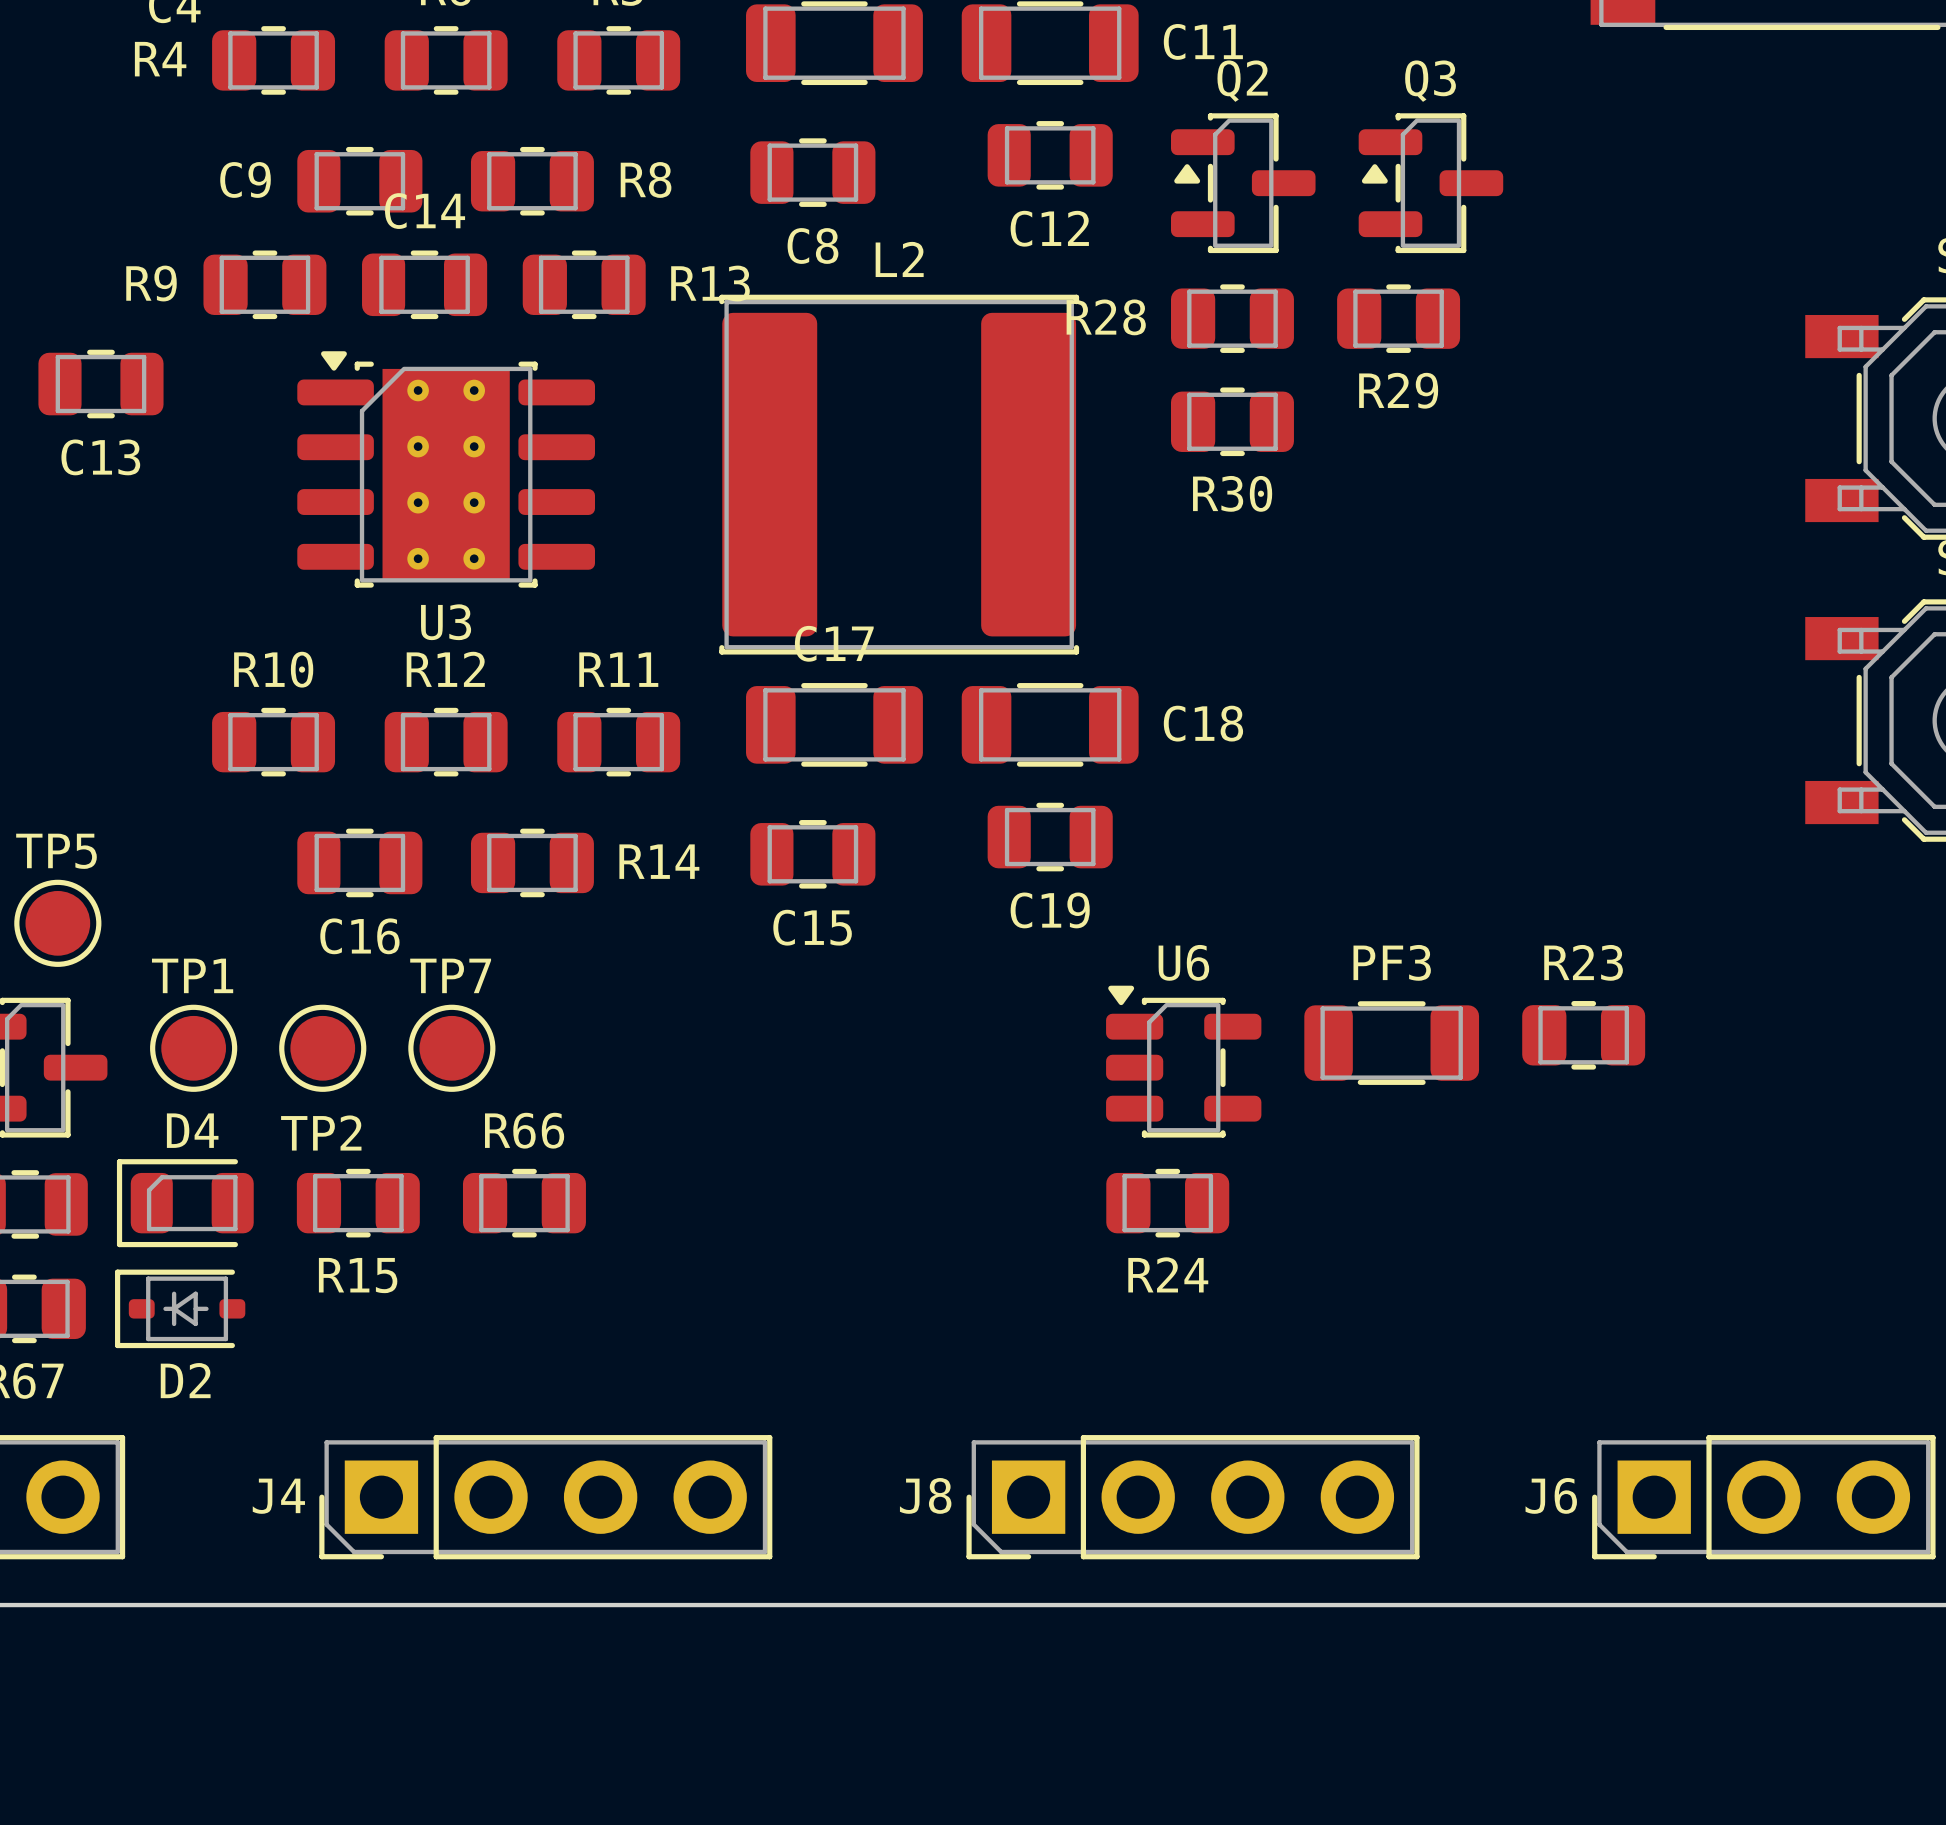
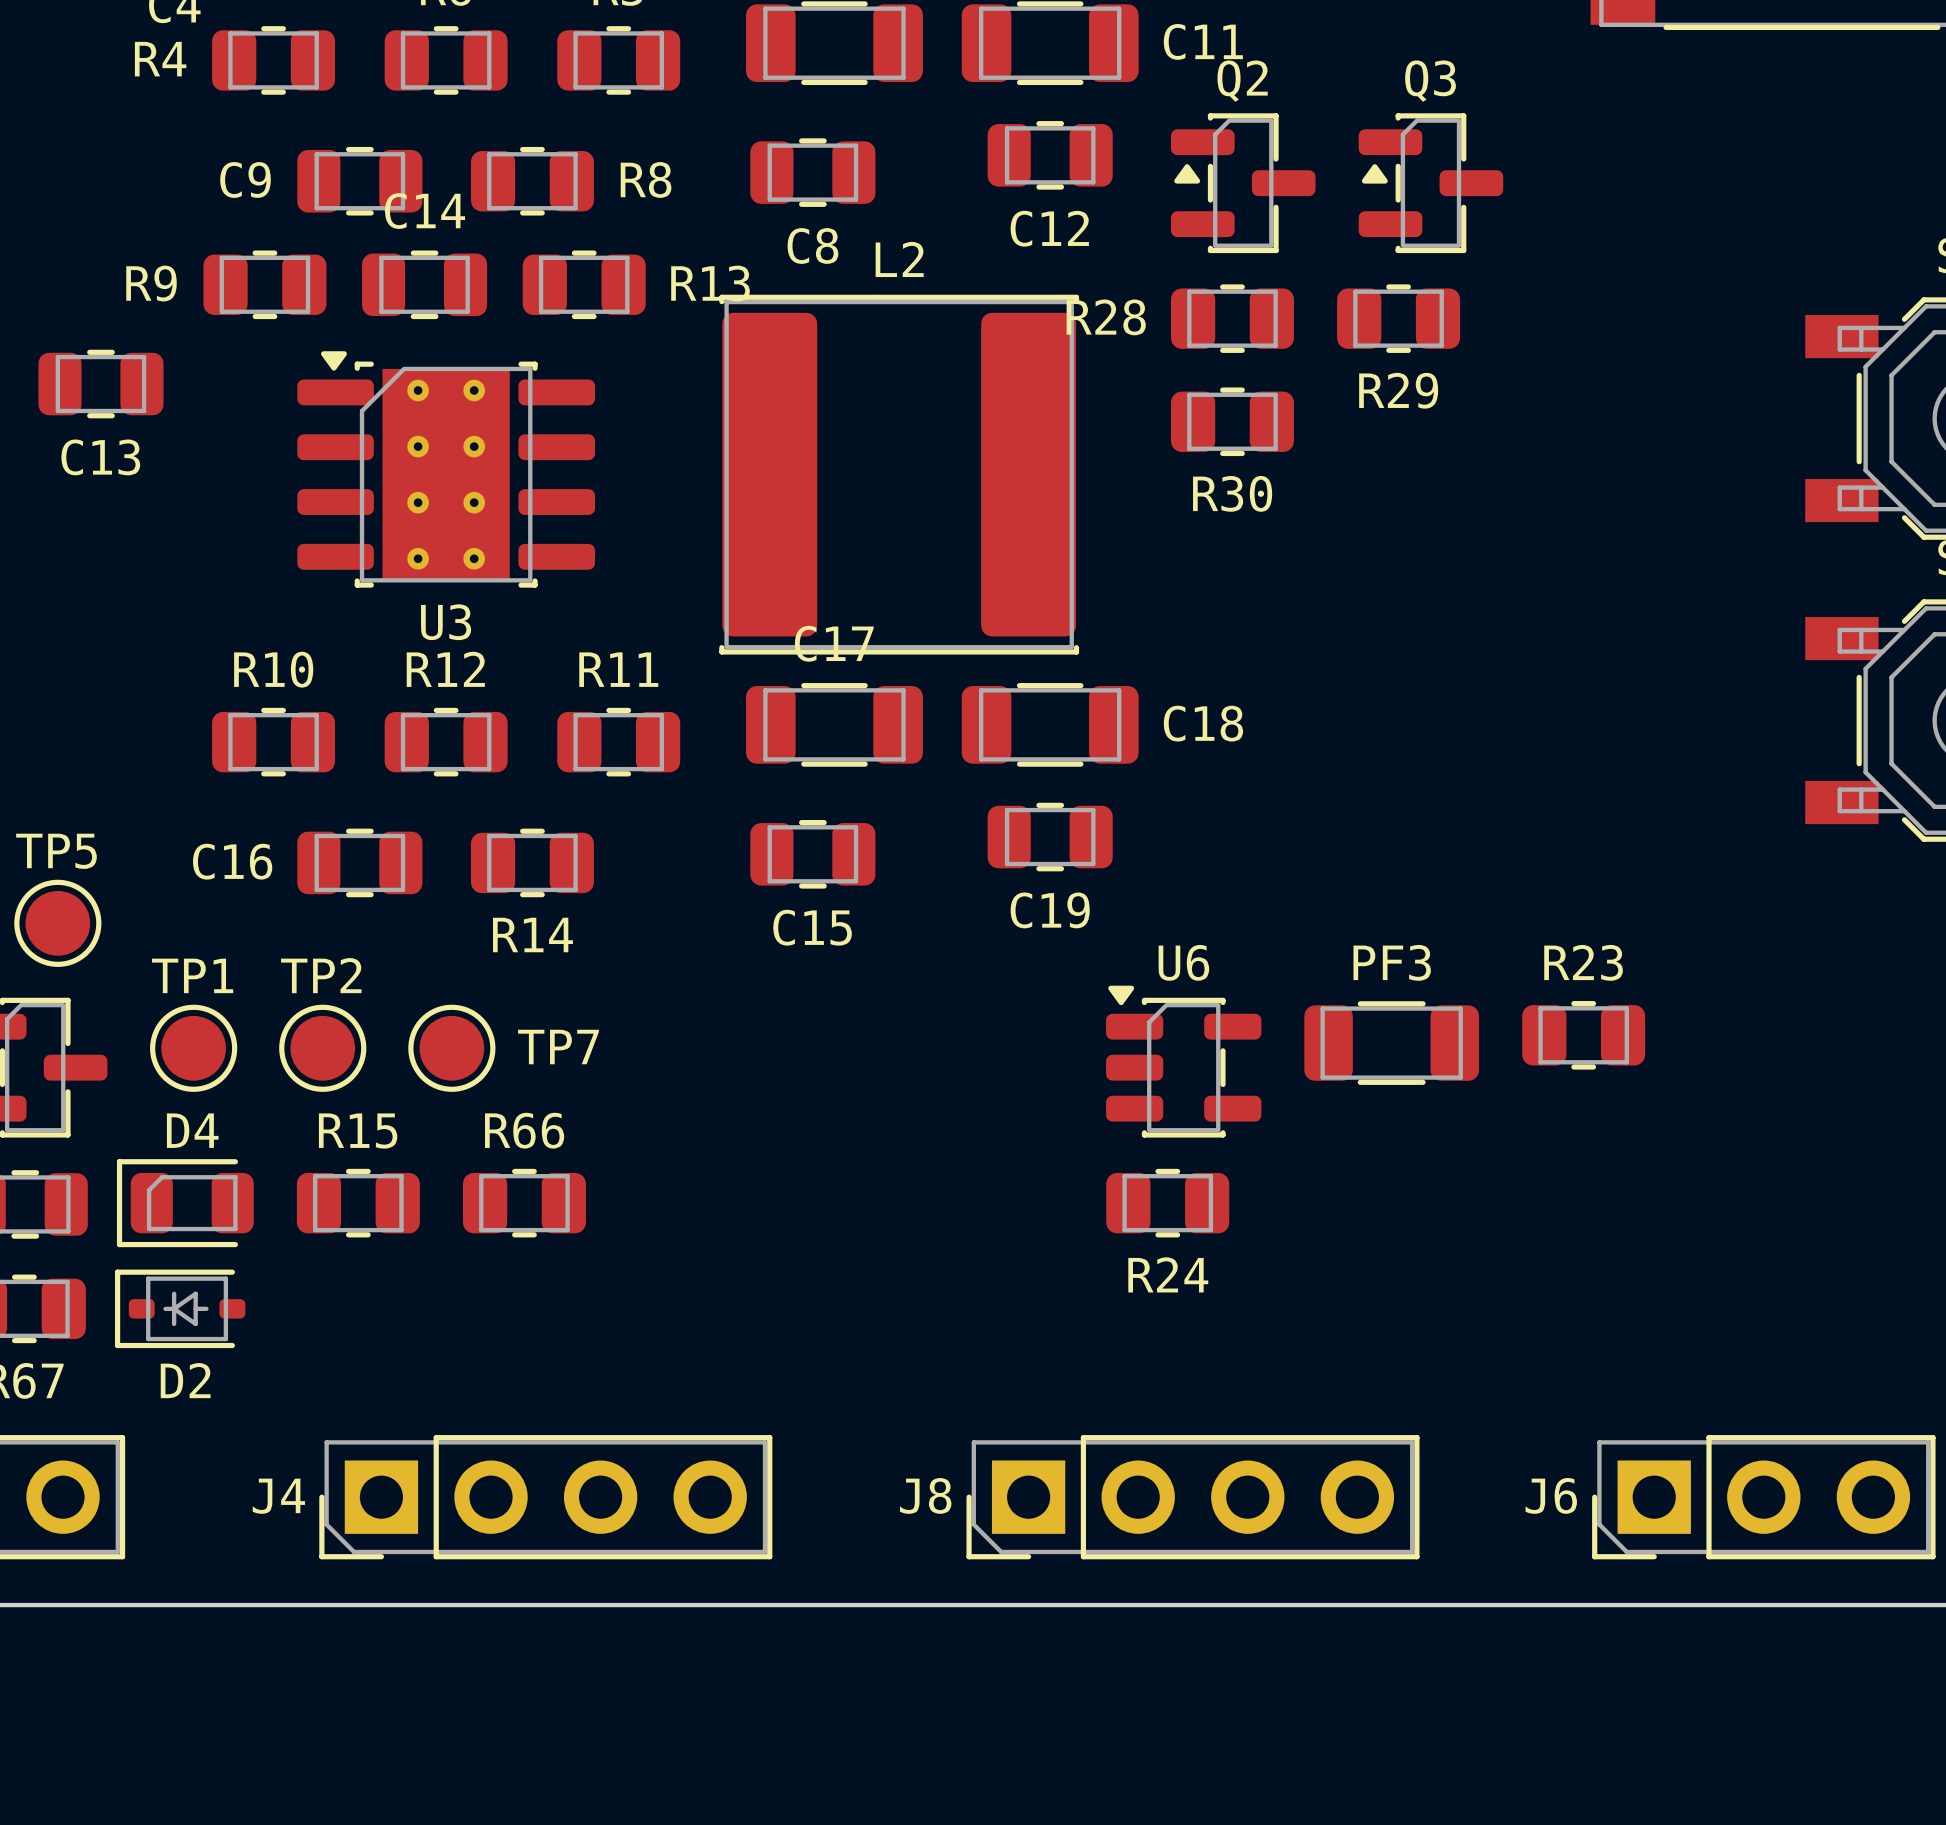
R14 name position: R14 (659, 861) -> R14 (532, 935)
C16 name position: C16 (359, 936) -> C16 (232, 861)
TP7 name position: TP7 (450, 975) -> TP7 (558, 1047)
TP2 name position: TP2 (321, 1132) -> TP2 (321, 975)
R15 name position: R15 (358, 1275) -> R15 (358, 1131)

